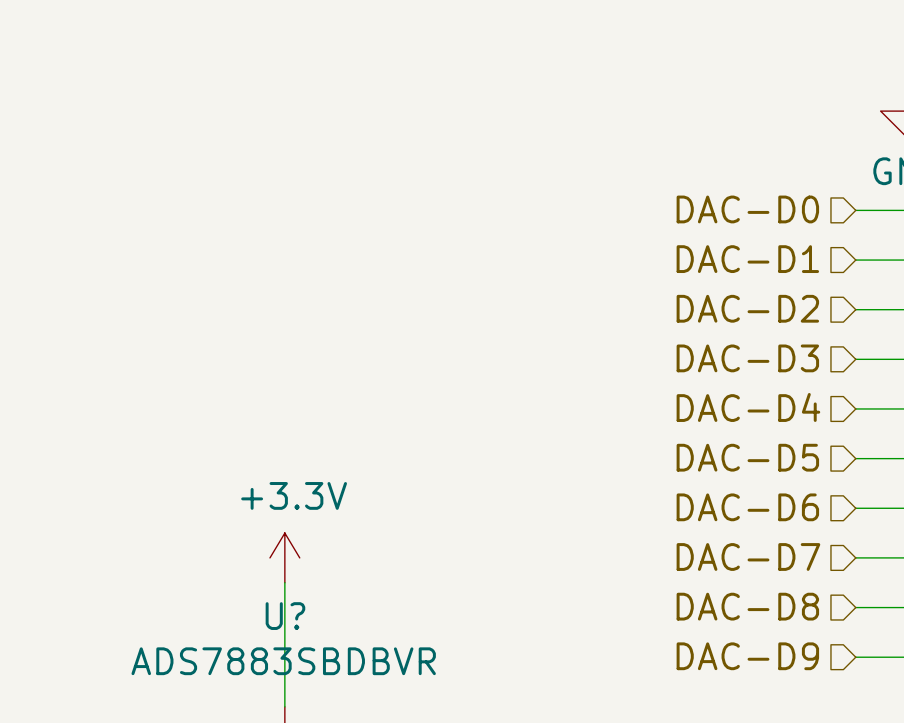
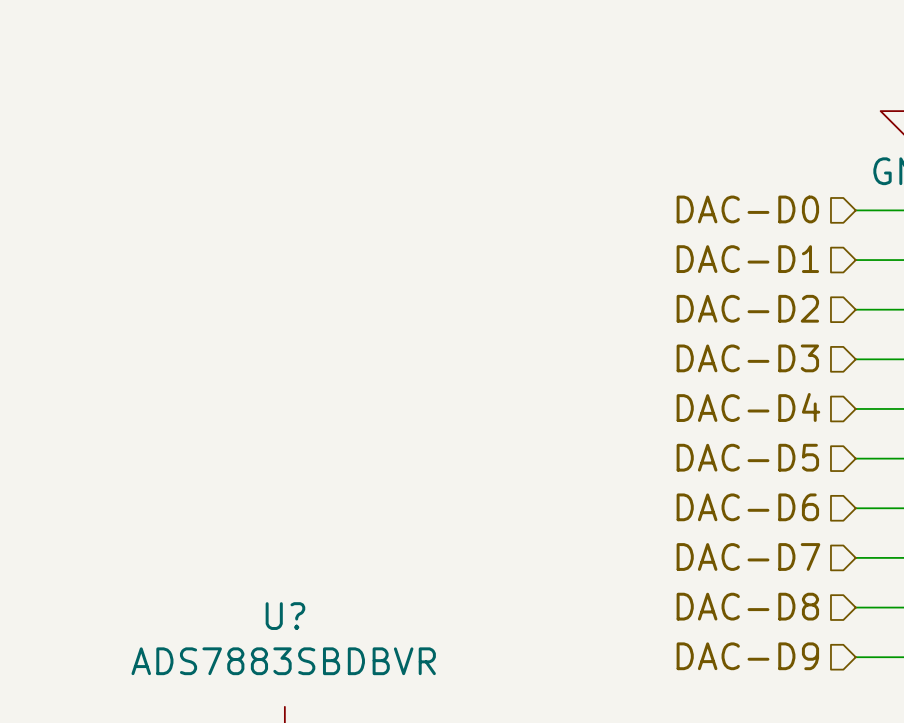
power symbol: +3.3V (284, 557) -> none
wire: (284, 582) (284, 706) -> none

